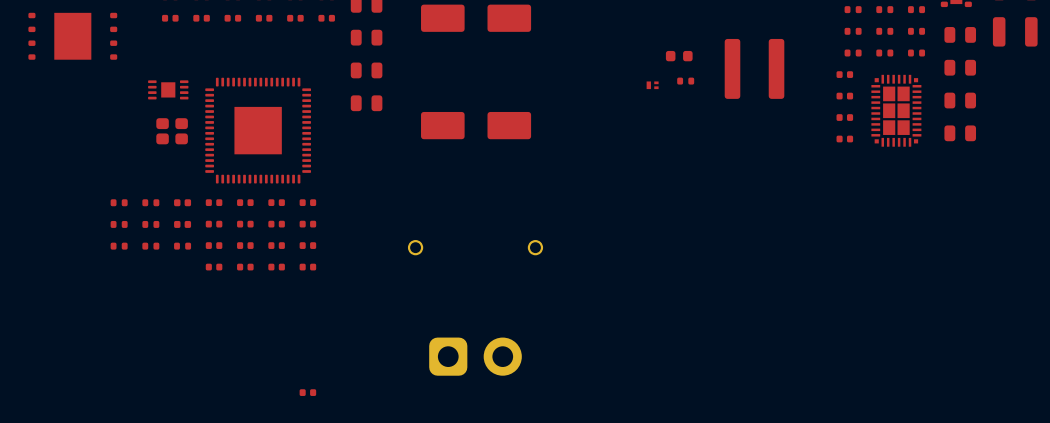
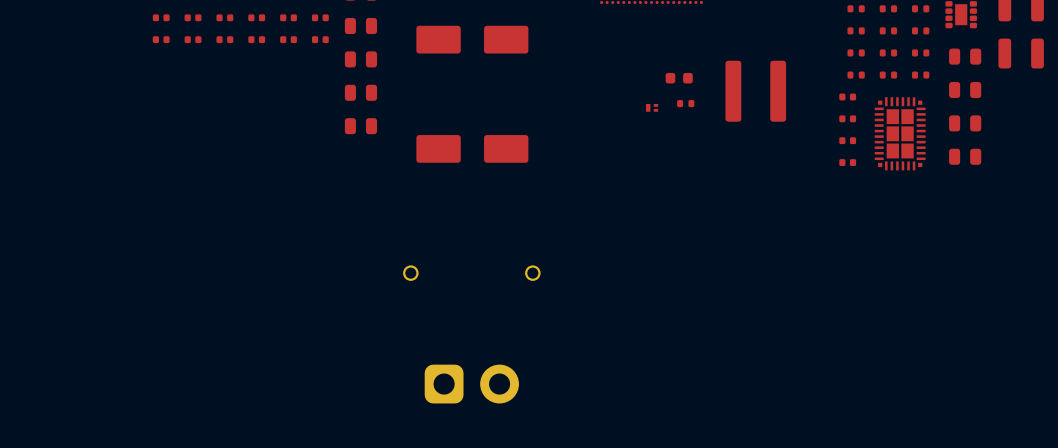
part: (72, 36) -> none
part: (168, 89) -> none
part: (258, 130) -> none
part: (172, 131) -> none
part: (119, 202) -> none
part: (150, 202) -> none
part: (182, 202) -> none
part: (214, 202) -> none
part: (245, 202) -> none
part: (276, 202) -> none
part: (307, 202) -> none
part: (119, 224) -> none
part: (150, 224) -> none
part: (182, 224) -> none
part: (214, 224) -> none
part: (245, 224) -> none
part: (276, 224) -> none
part: (307, 224) -> none
part: (214, 245) -> none
part: (245, 245) -> none
part: (276, 245) -> none
part: (307, 245) -> none
part: (119, 246) -> none
part: (150, 246) -> none
part: (182, 246) -> none
part: (214, 267) -> none
part: (245, 267) -> none
part: (276, 267) -> none
part: (307, 267) -> none
part: (307, 392) -> none

